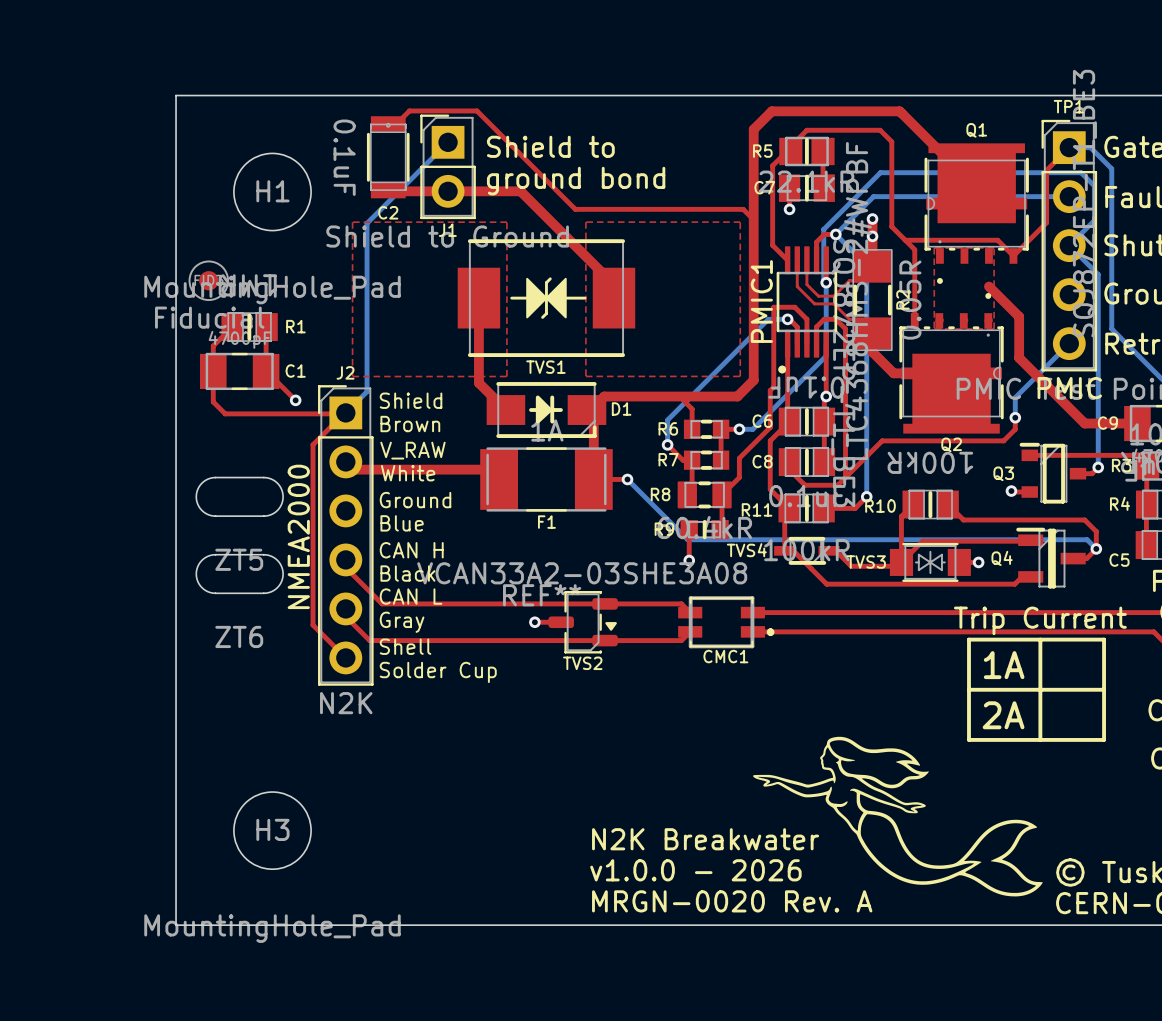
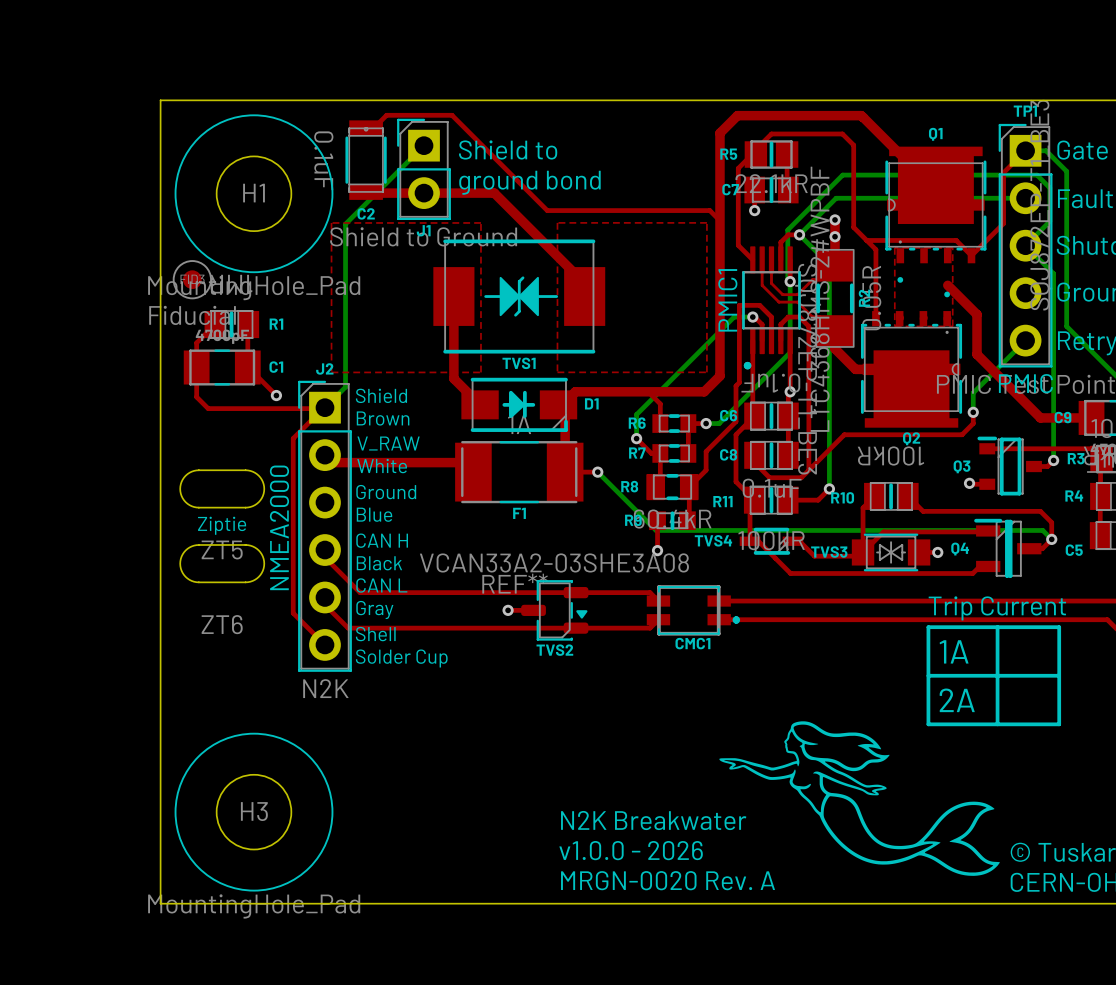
drawing: none -> [174, 114, 334, 274]
text: none -> Ziptie (222, 525)
drawing: none -> [174, 732, 334, 892]

